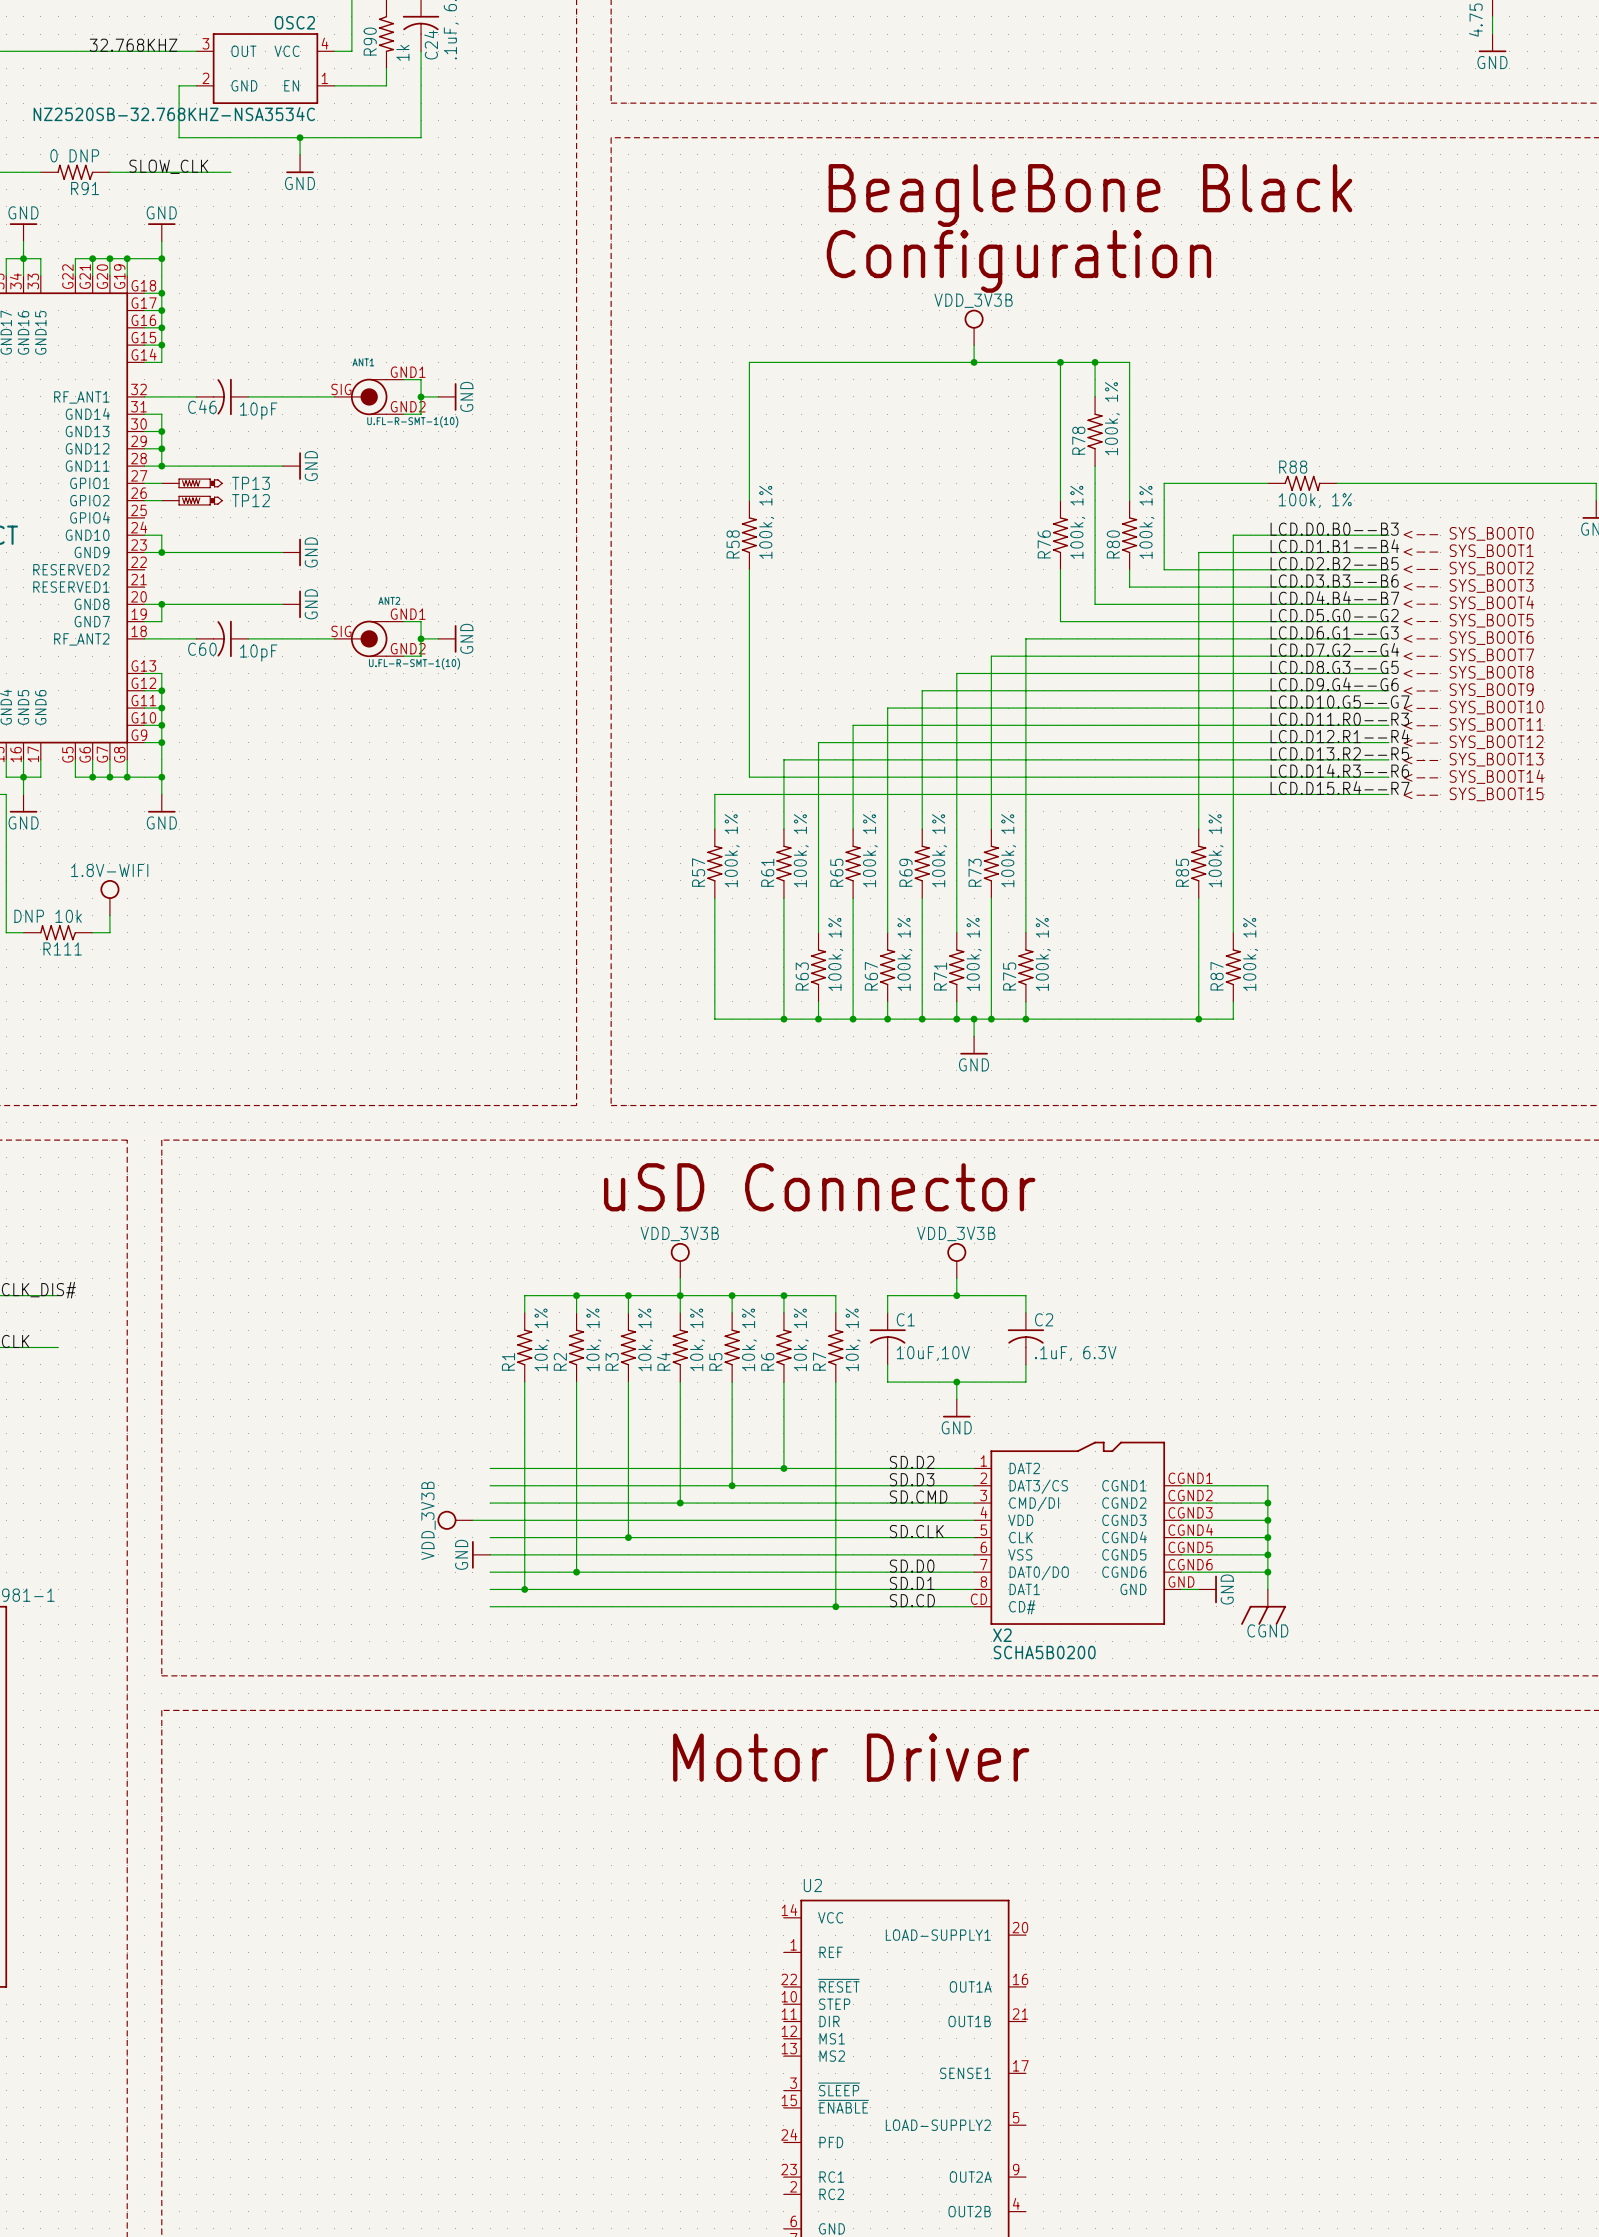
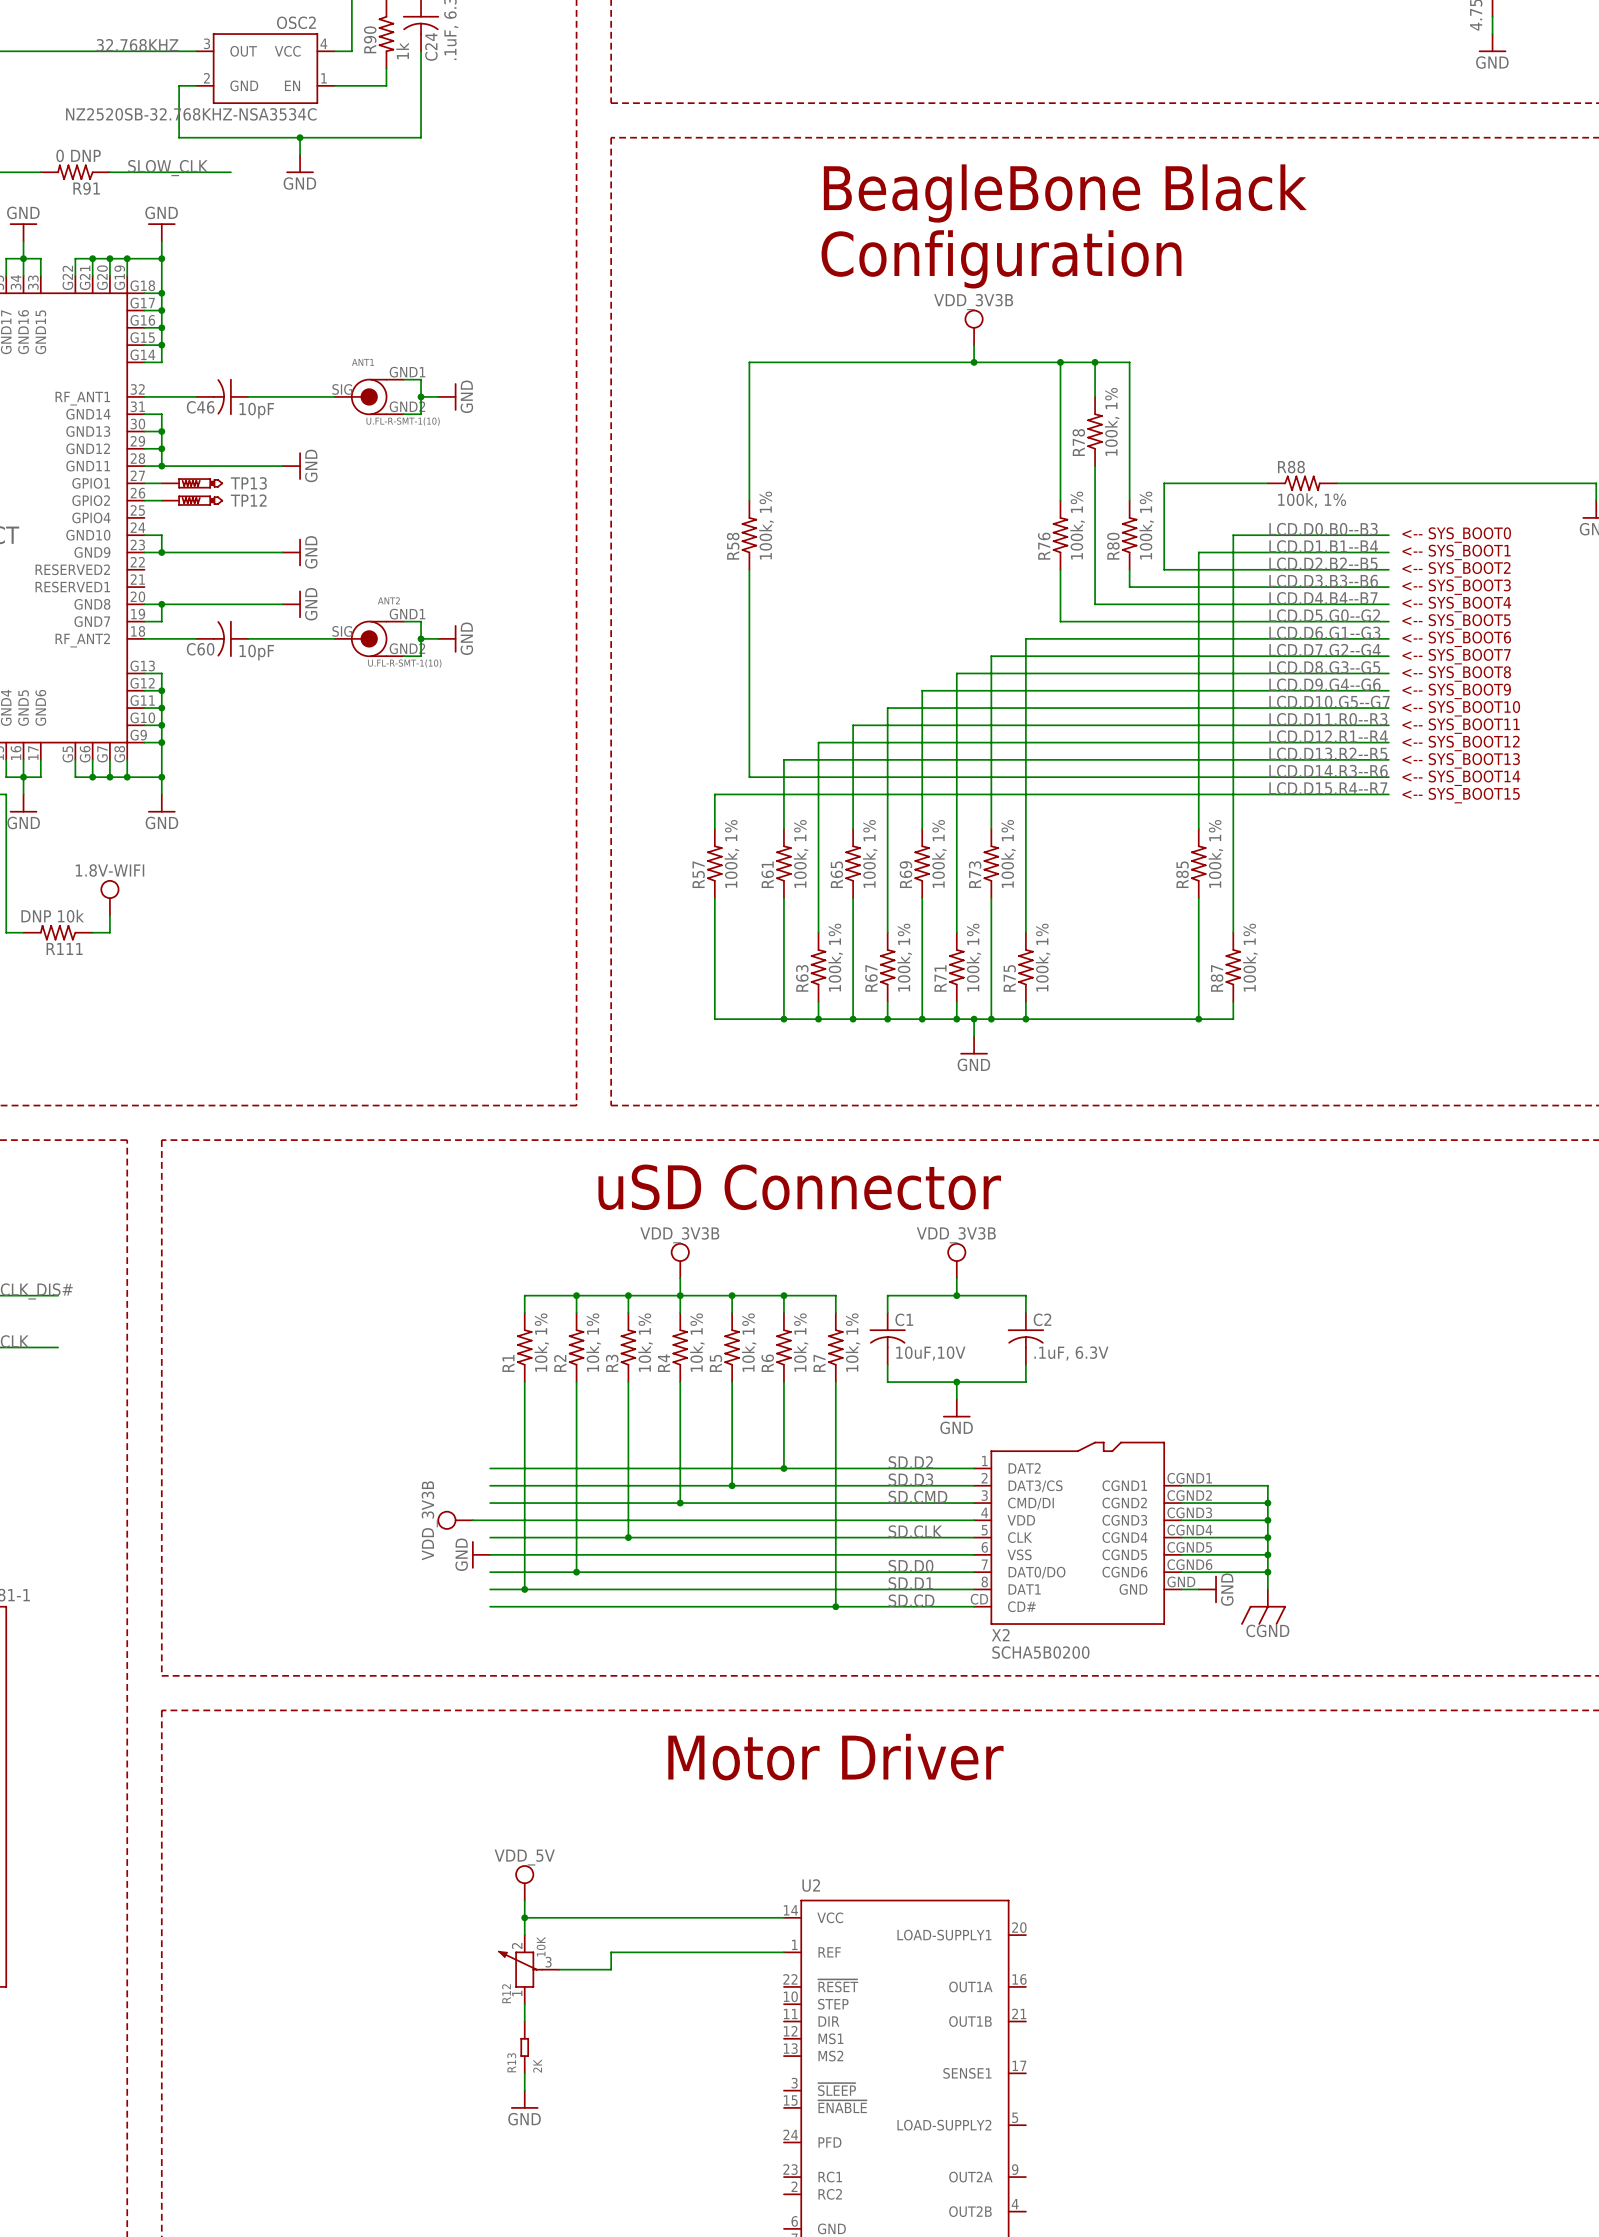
power symbol: none -> VDD_5V (524, 1882)
wire: none -> (524, 1900) (524, 1935)
wire: none -> (524, 1917) (783, 1917)
junction: none -> (524, 1917)
wire: none -> (783, 1952) (611, 1952) (611, 1969) (559, 1969)
R12: none -> 10K (528, 1969)
wire: none -> (524, 2004) (524, 2021)
R13: none -> 2K (524, 2047)
wire: none -> (524, 2073) (524, 2090)
power symbol: none -> GND (524, 2099)

